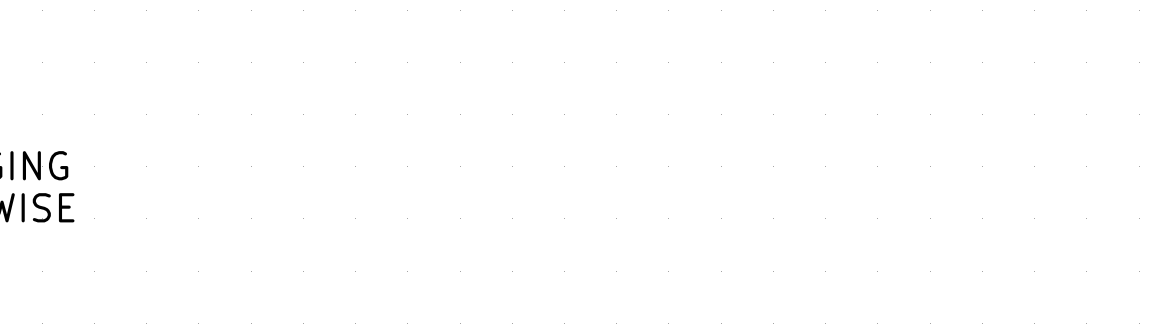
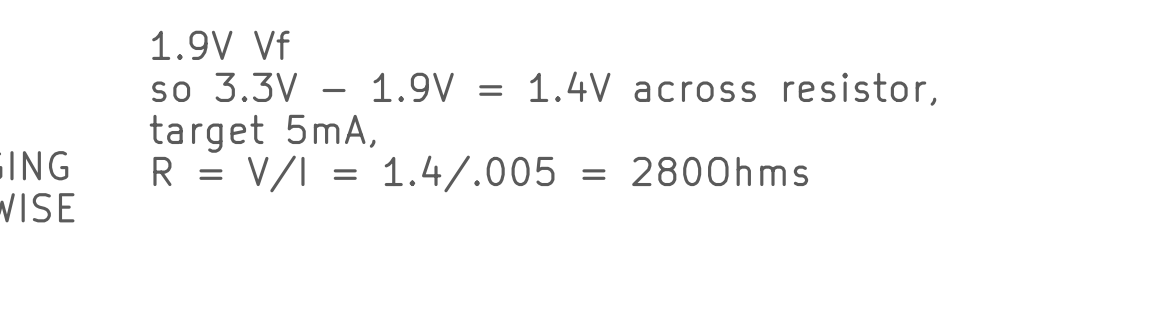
text: none -> 1.9V Vf (220, 45)
text: none -> so 3.3V - 1.9V = 1.4V across resistor, (544, 88)
text: none -> target 5mA, (262, 133)
text: none -> R = V/I = 1.4/.005 = 280Ohms (480, 173)

